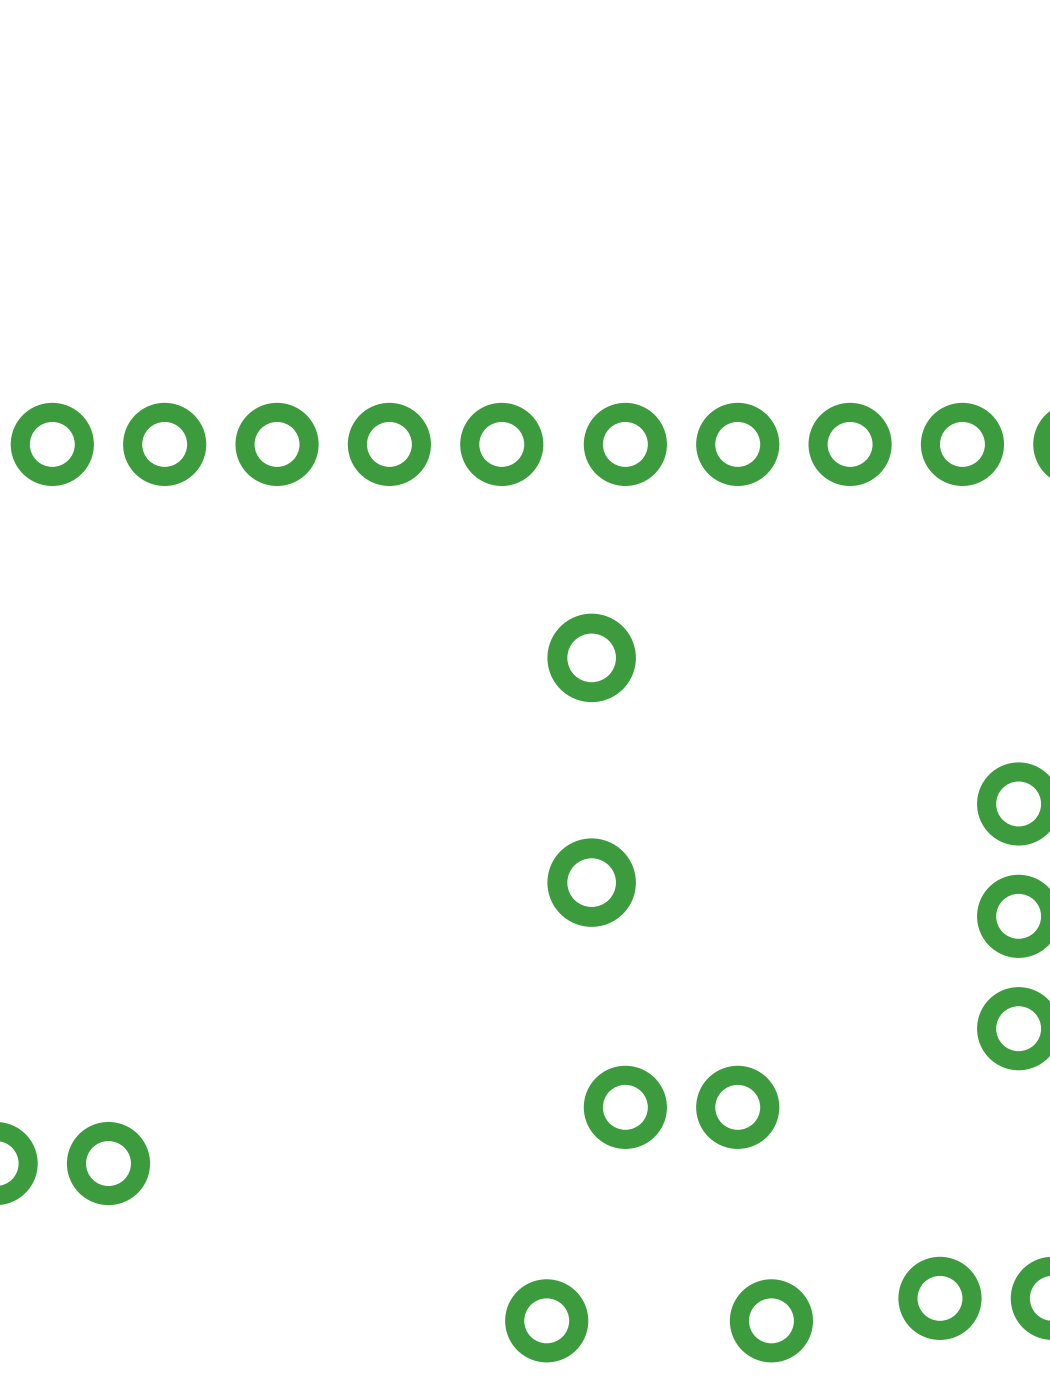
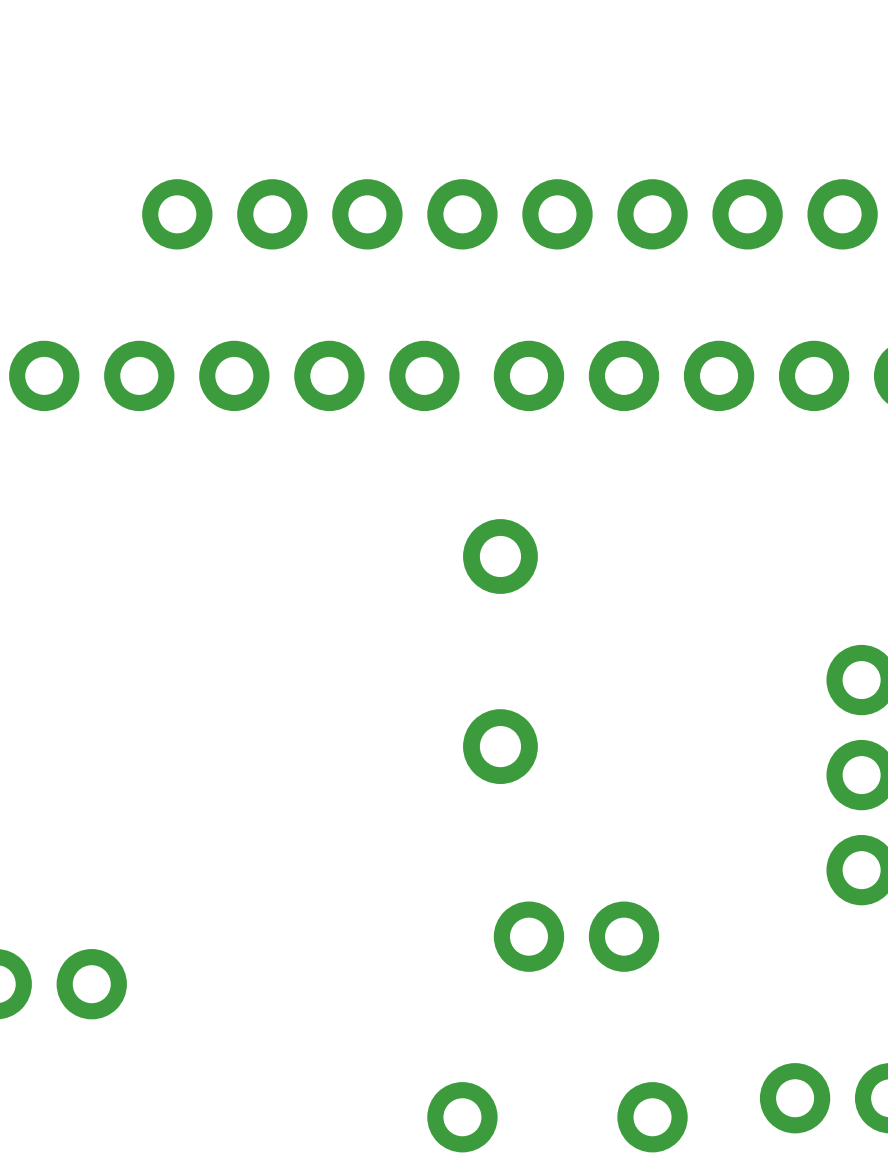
part: none -> (509, 214)

